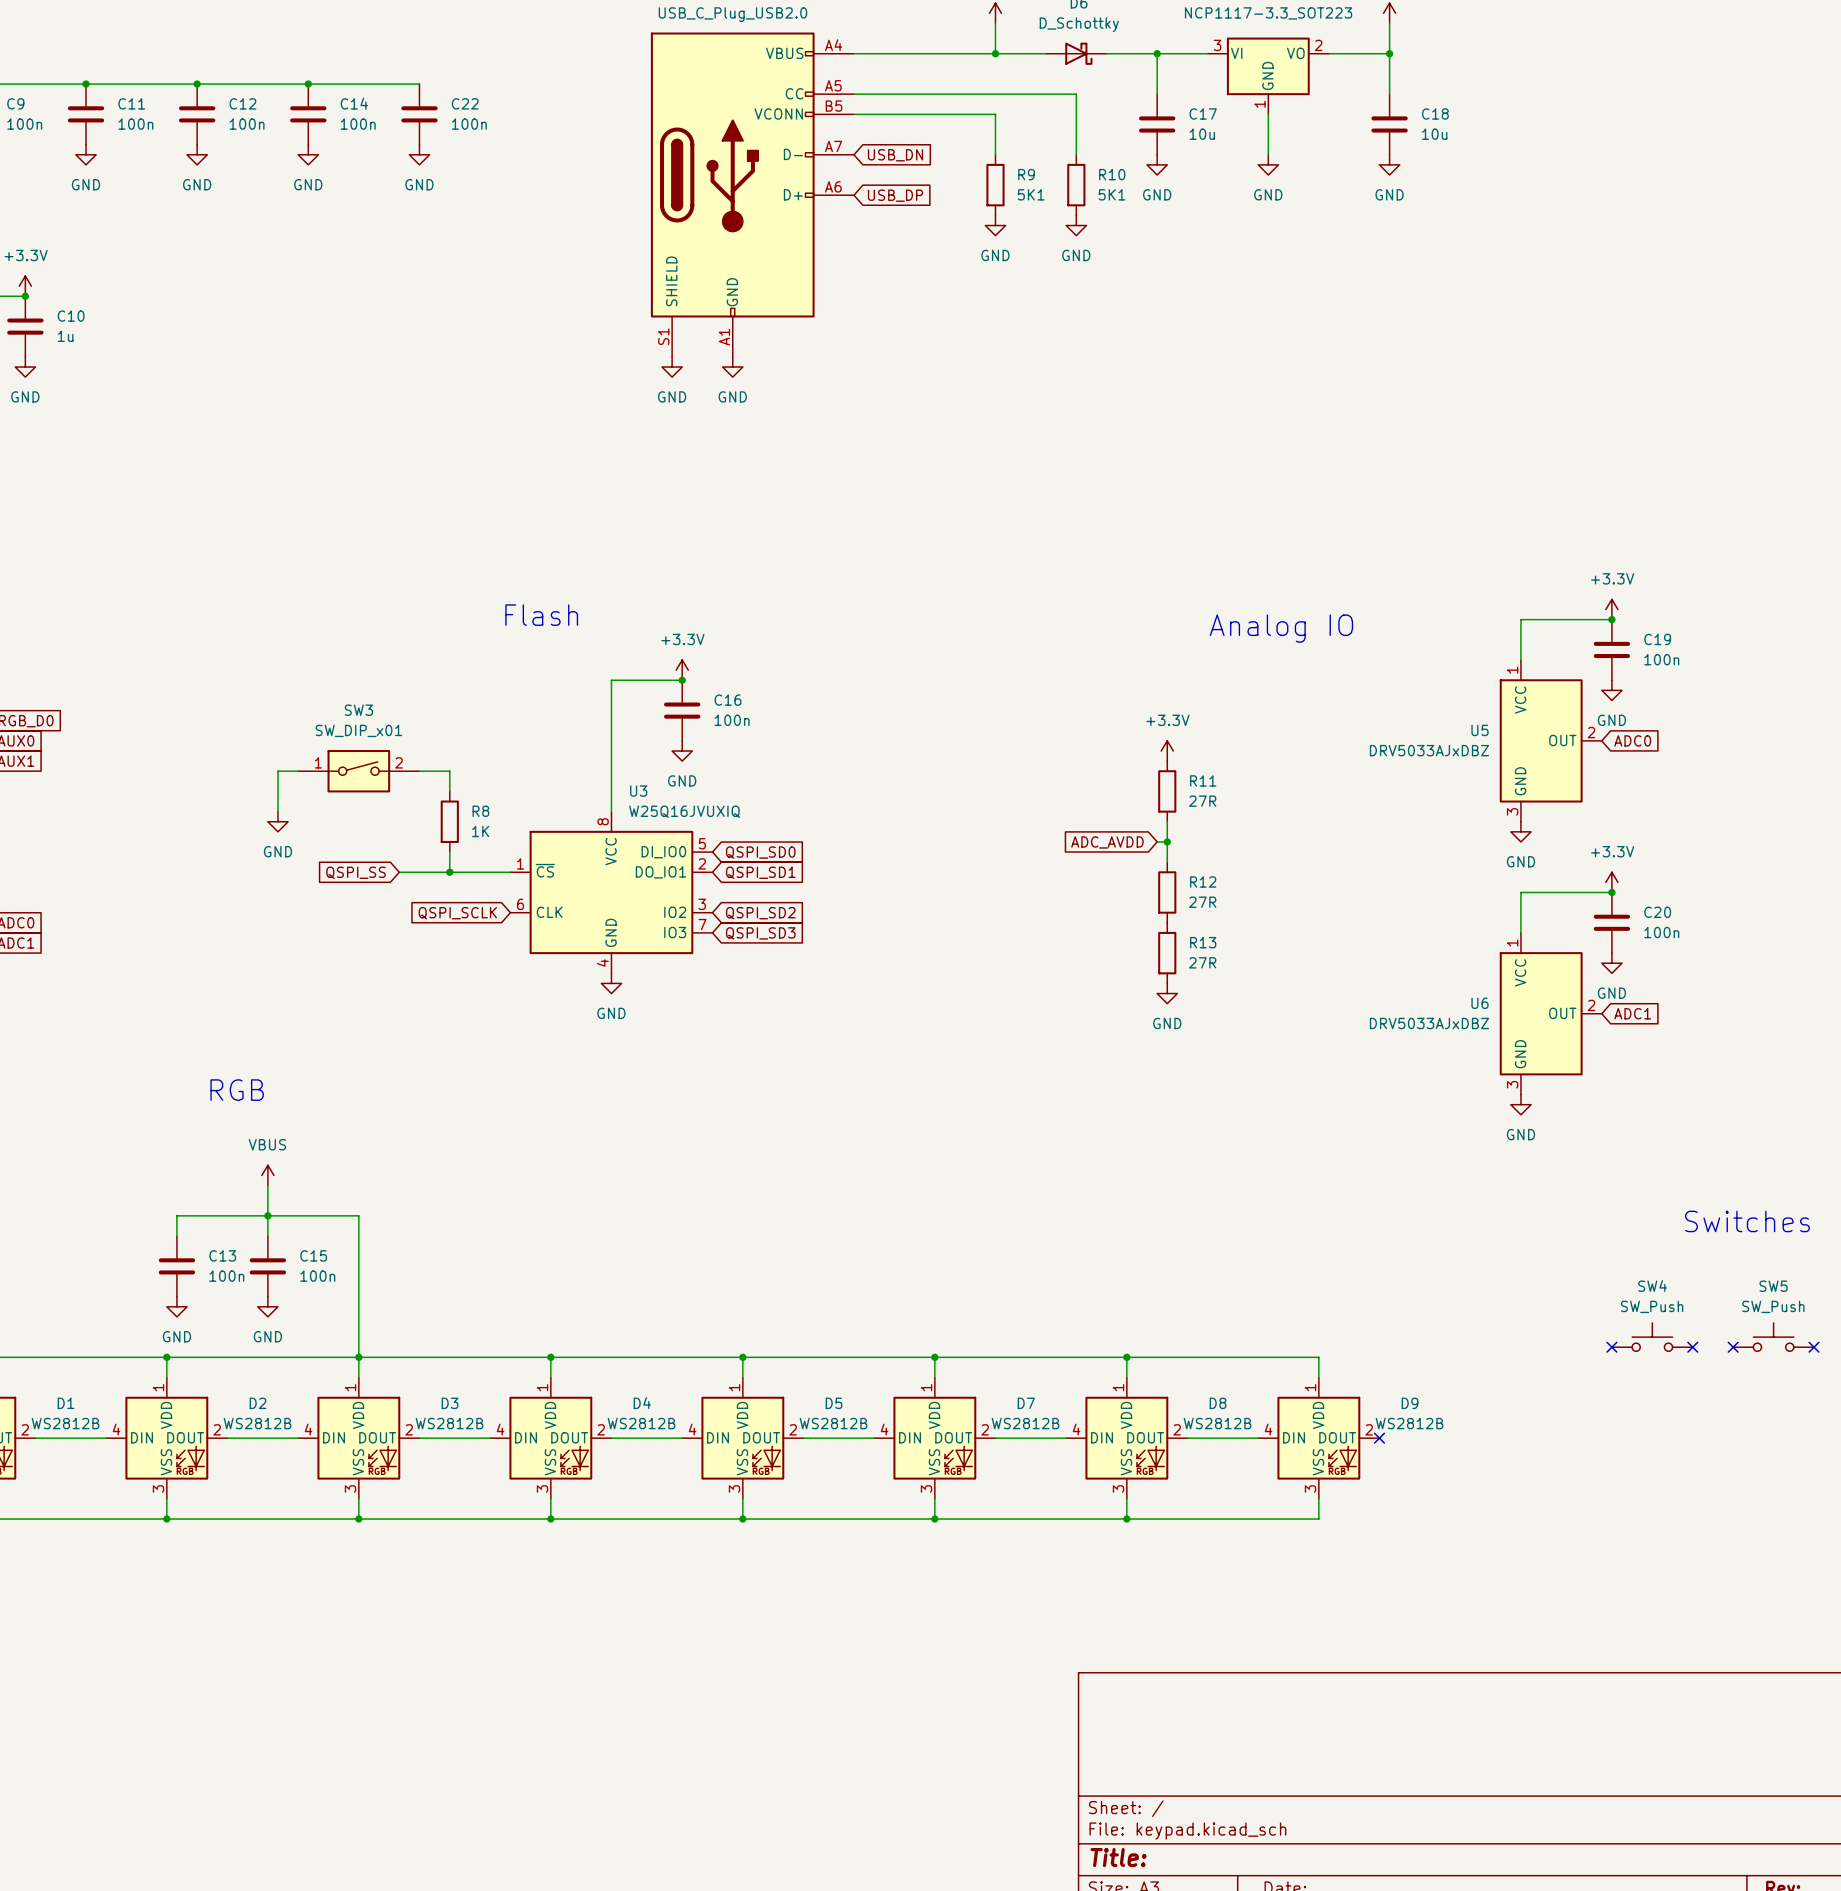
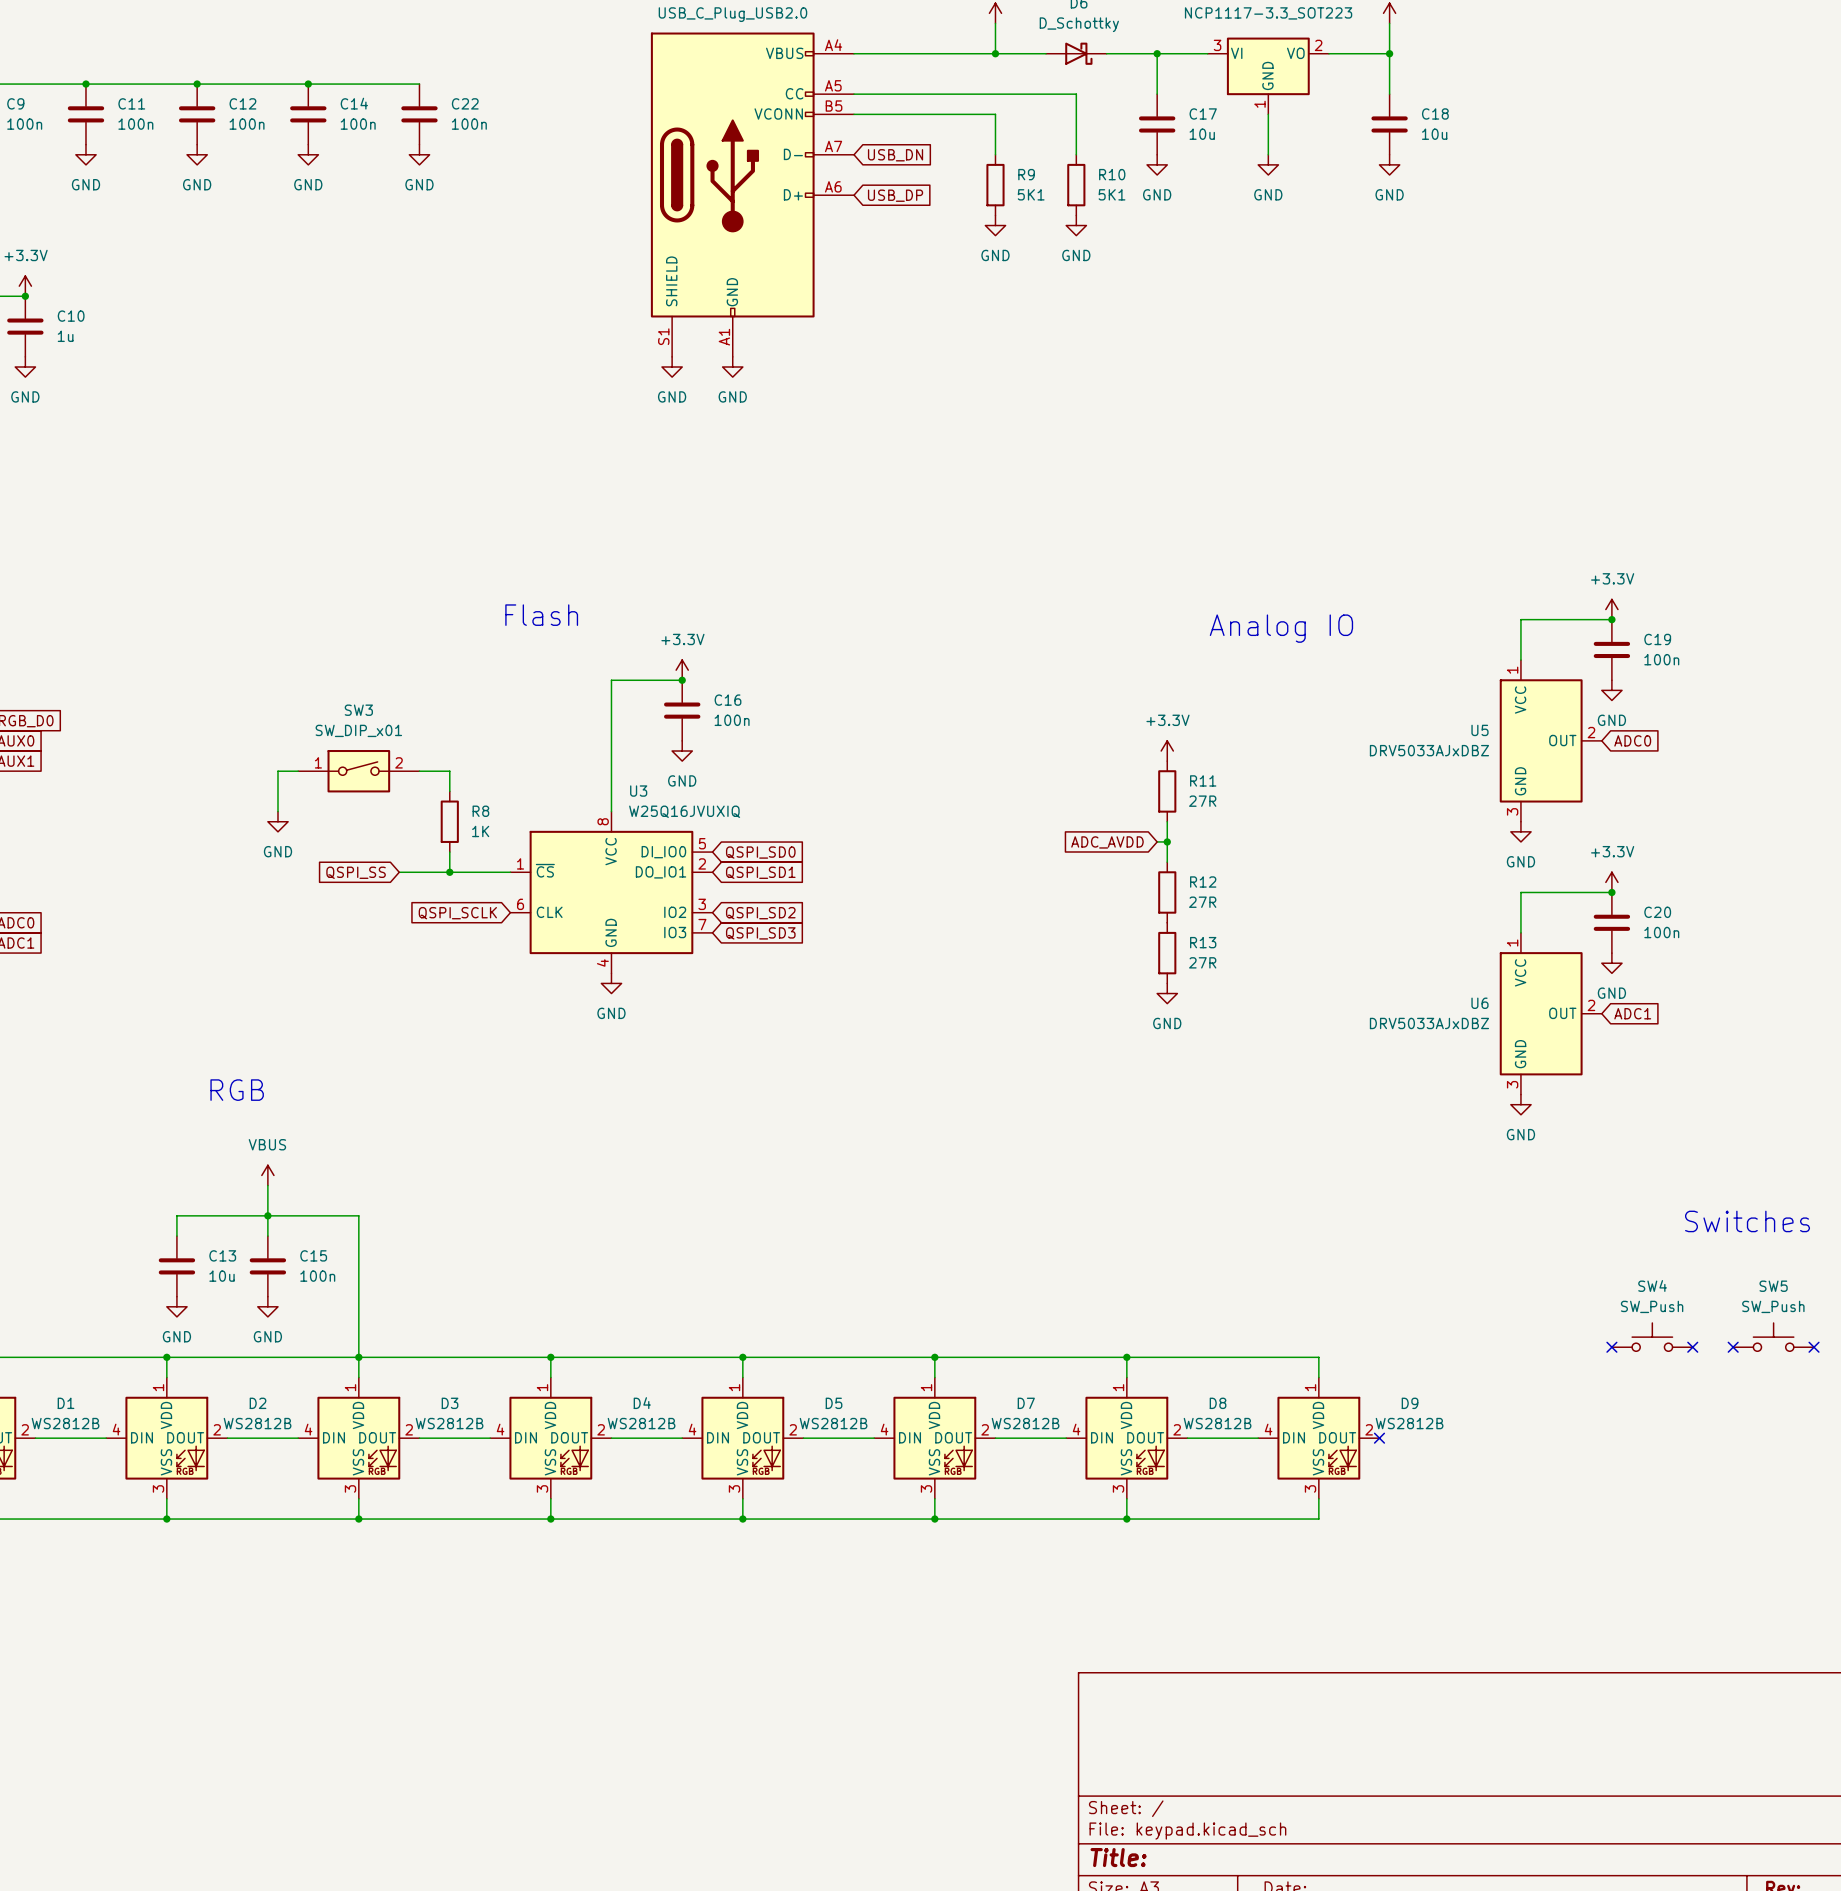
C13 value: 100n (226, 1276) -> 10u (222, 1276)

